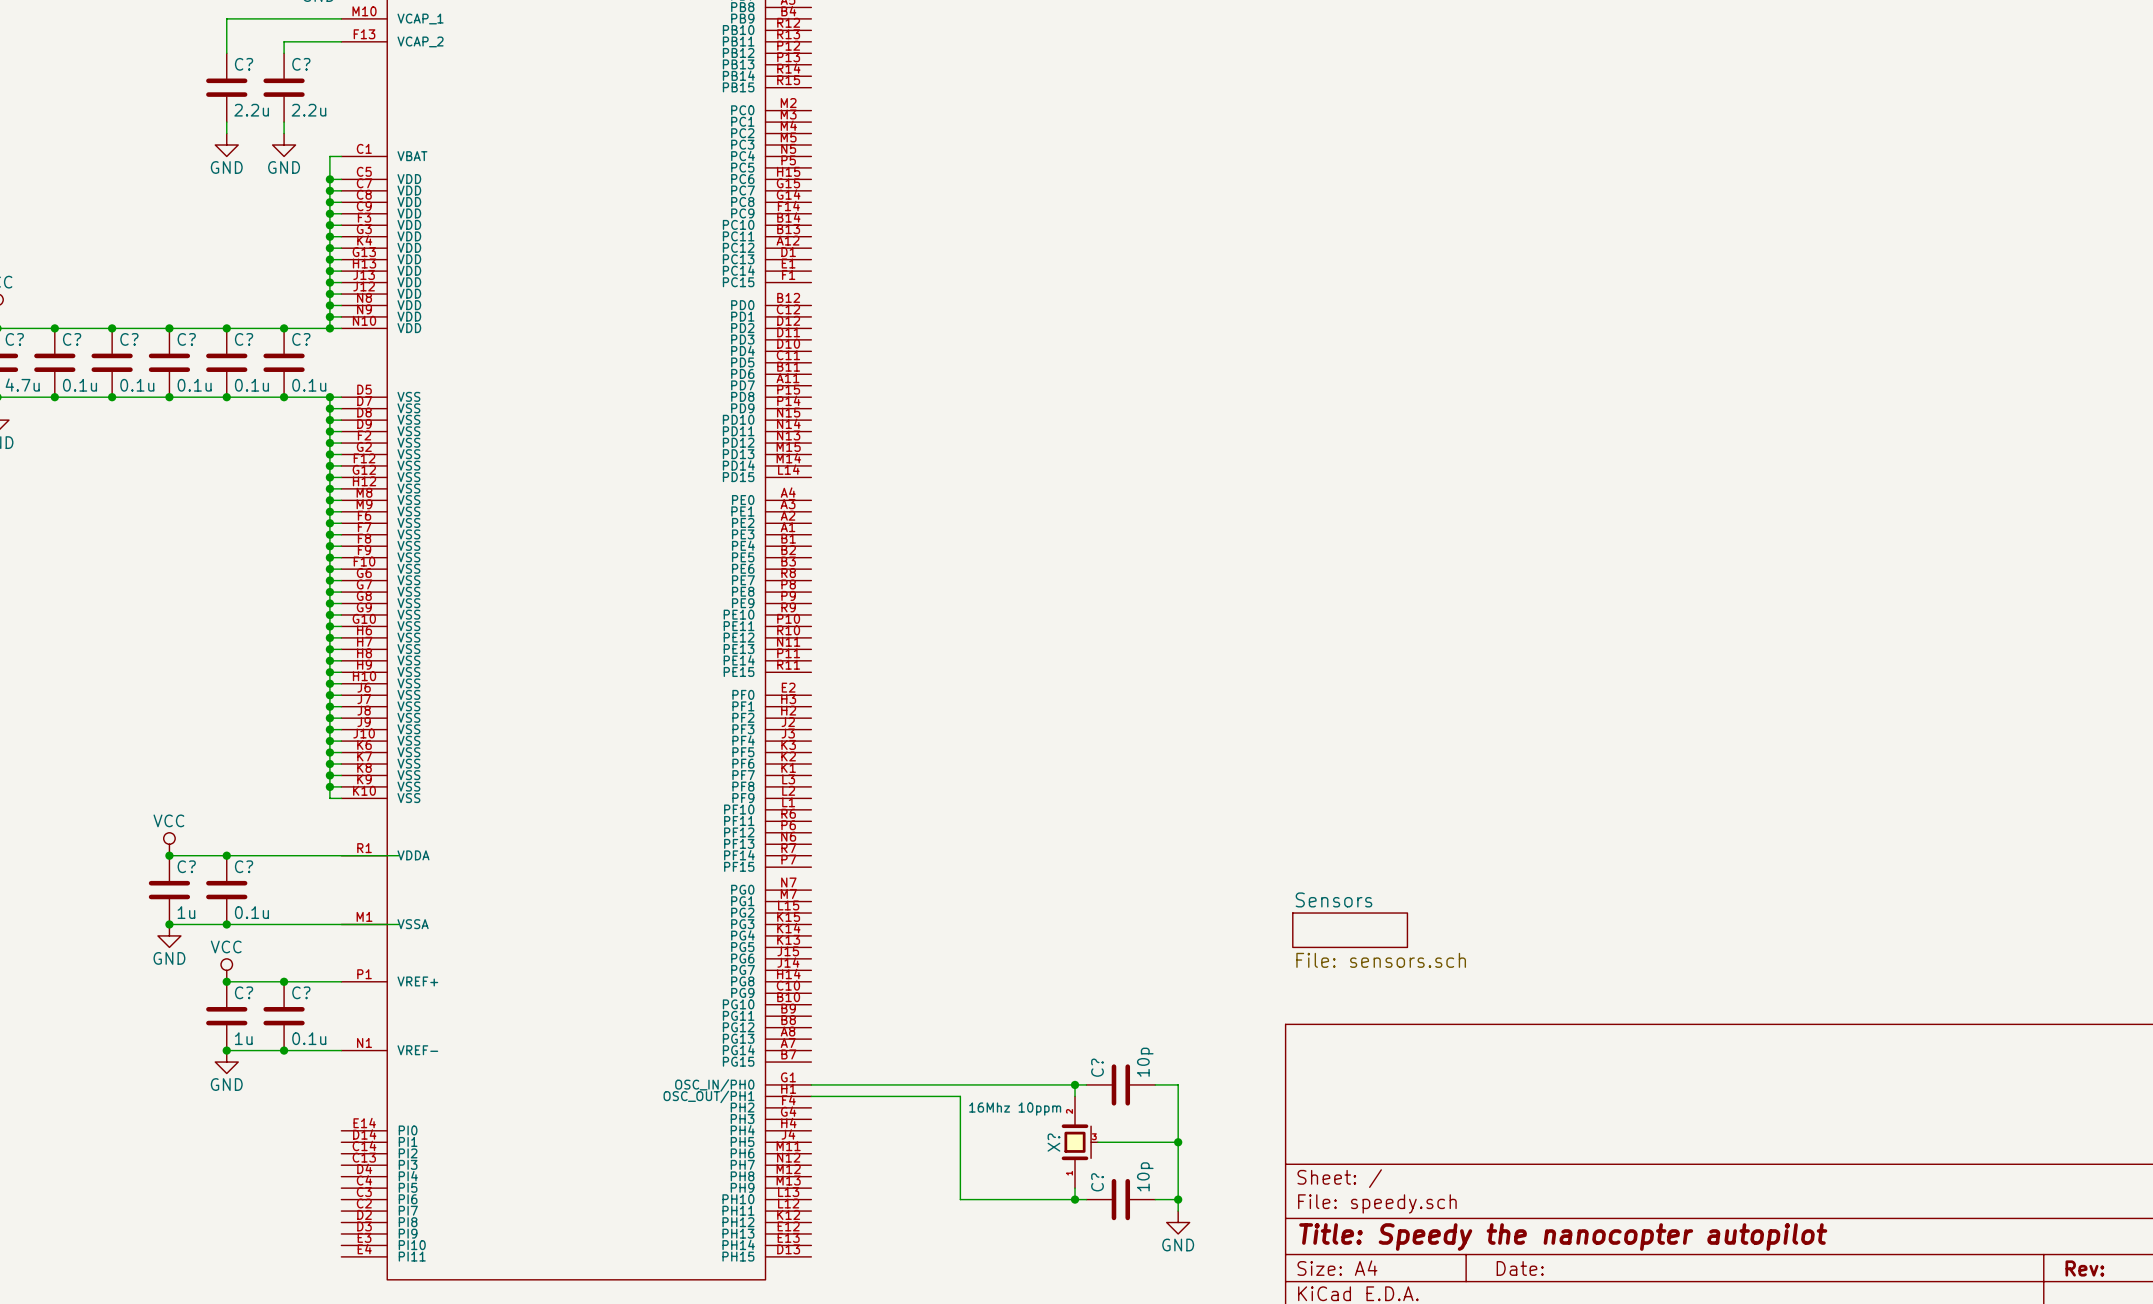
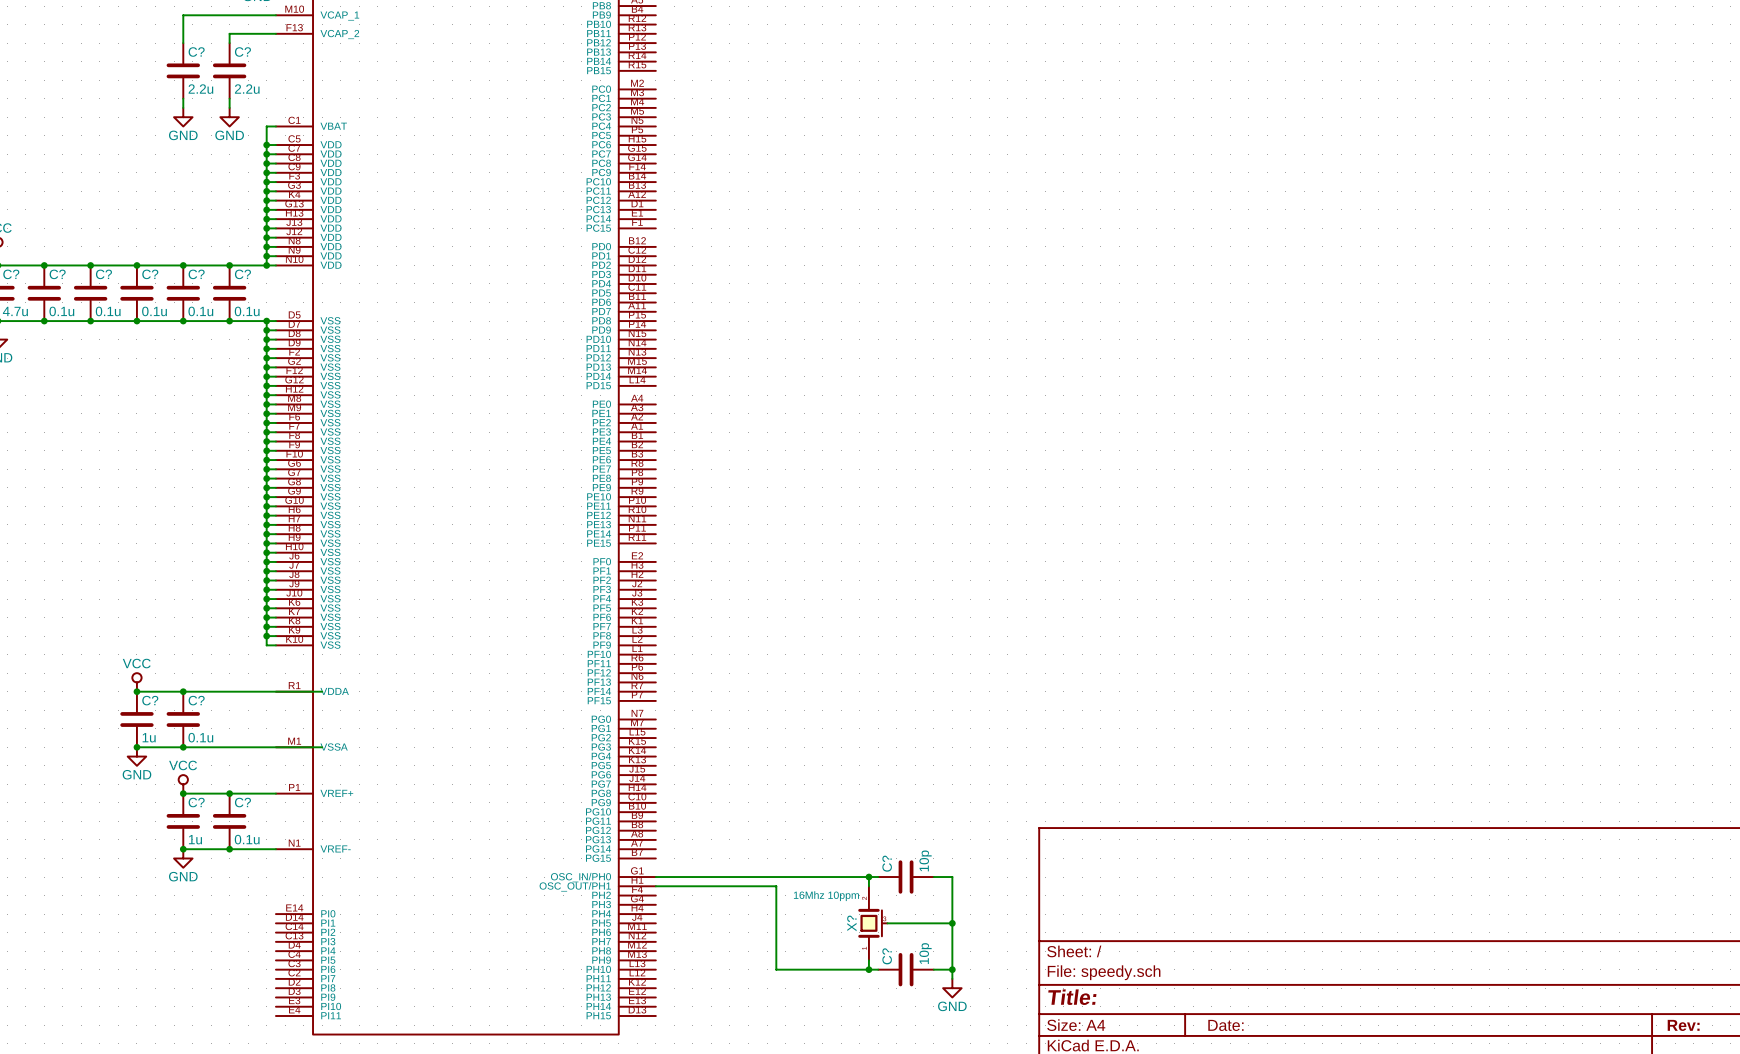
sheet Sensors: File: sensors.sch (1350, 930) -> none
title block: Title: Speedy the nanocopter autopilot (1563, 1237) -> Title: (1072, 997)

